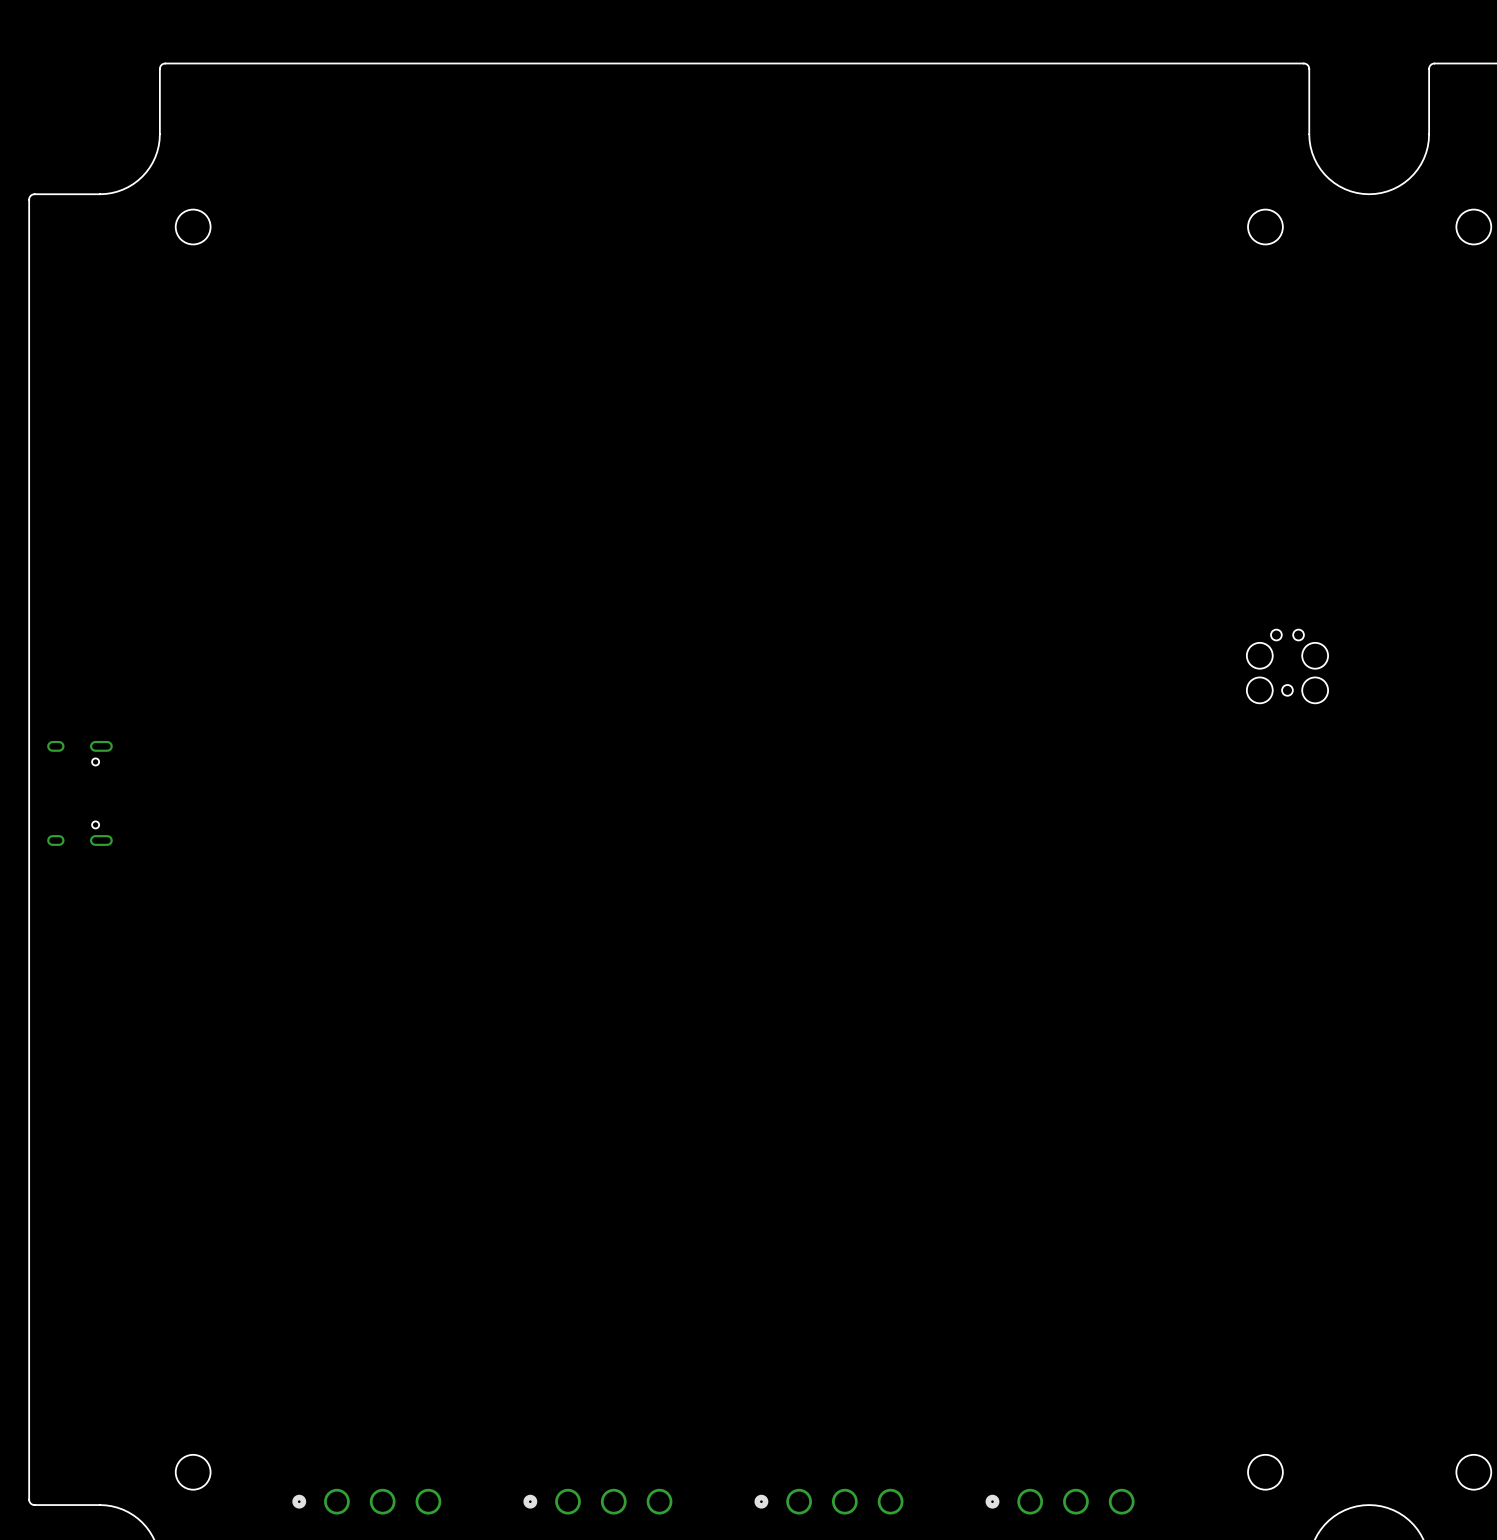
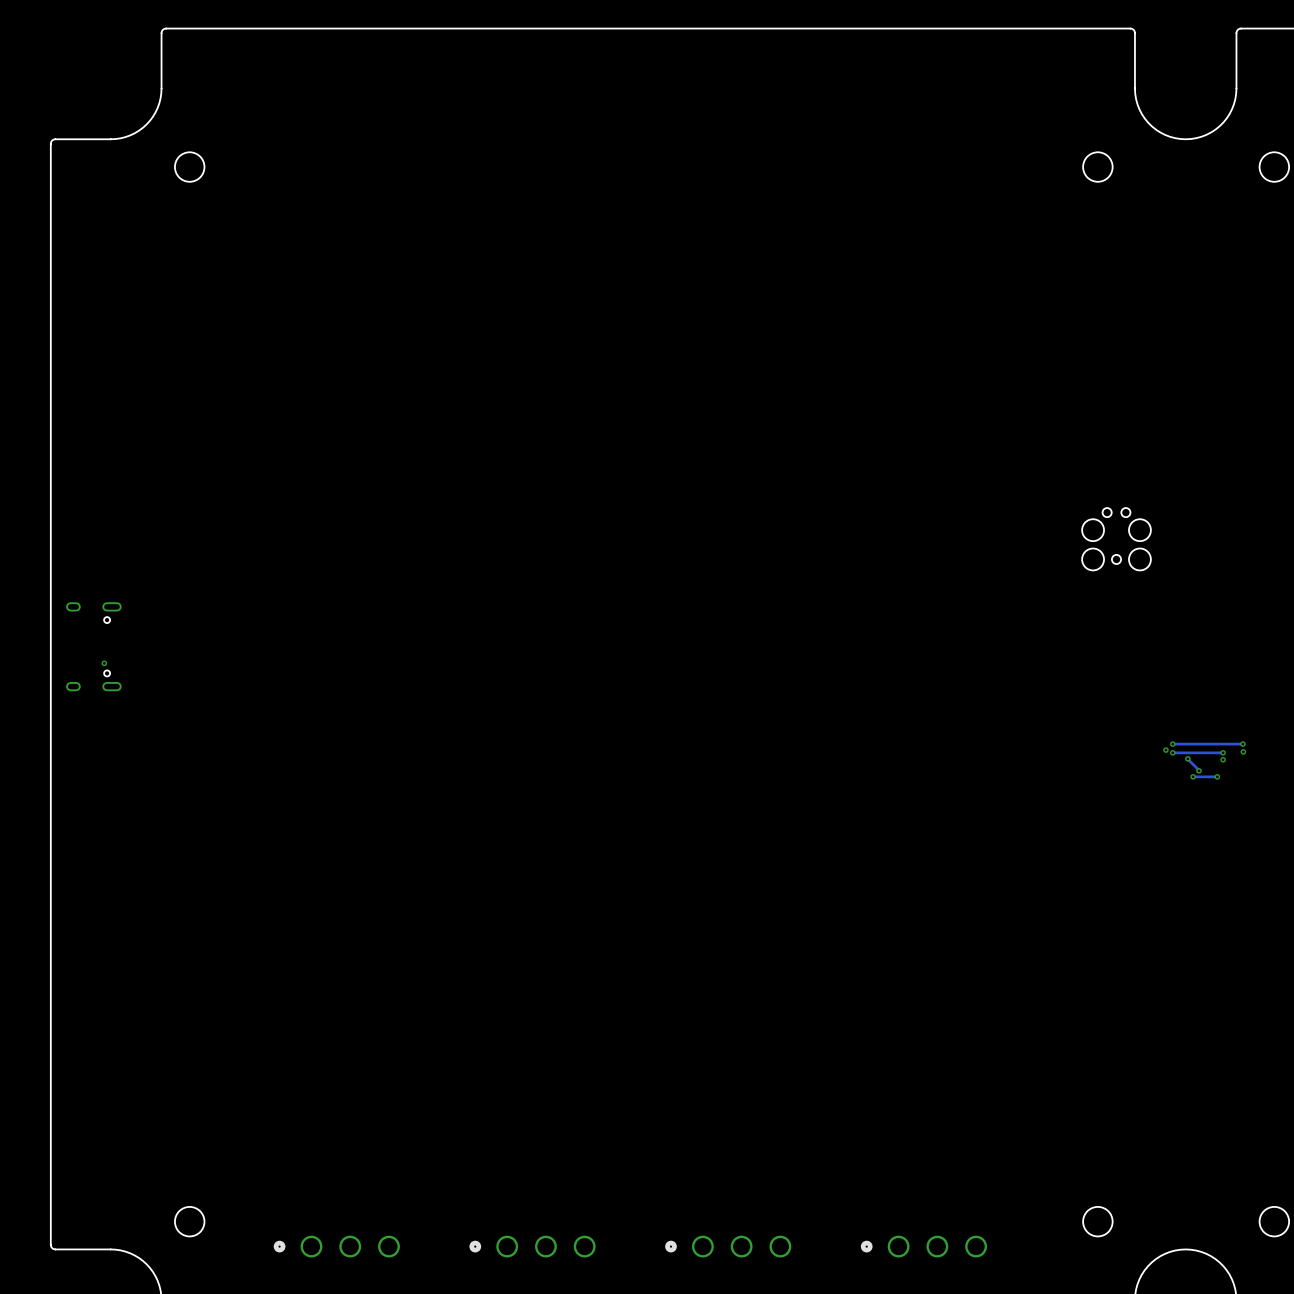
via: none -> (104, 663)
via: none -> (1172, 744)
track: none -> (1242, 744) (1172, 744)
via: none -> (1242, 744)
via: none -> (1165, 750)
via: none -> (1243, 751)
via: none -> (1172, 752)
track: none -> (1223, 752) (1172, 752)
via: none -> (1223, 752)
track: none -> (1187, 758) (1199, 770)
via: none -> (1187, 758)
via: none -> (1223, 759)
via: none -> (1199, 770)
via: none -> (1193, 776)
track: none -> (1217, 776) (1193, 776)
via: none -> (1217, 776)

